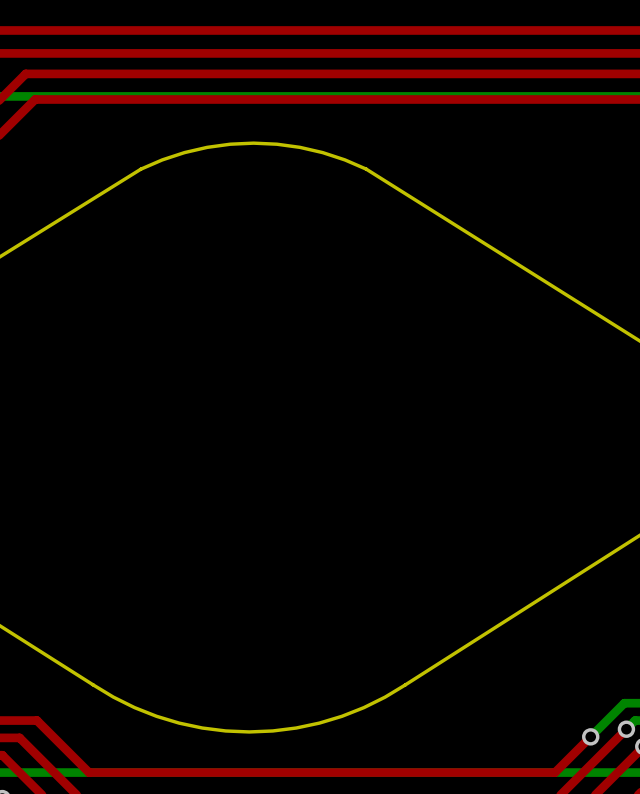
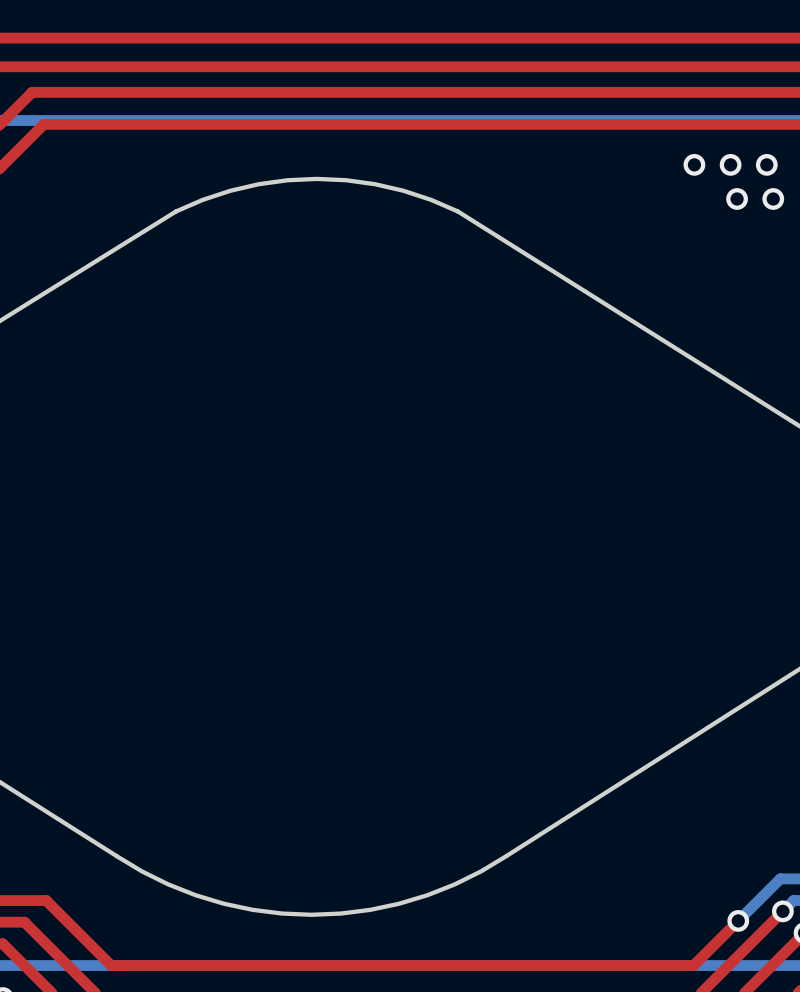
via: none -> (694, 164)
via: none -> (730, 164)
via: none -> (766, 164)
via: none -> (737, 198)
via: none -> (773, 198)

